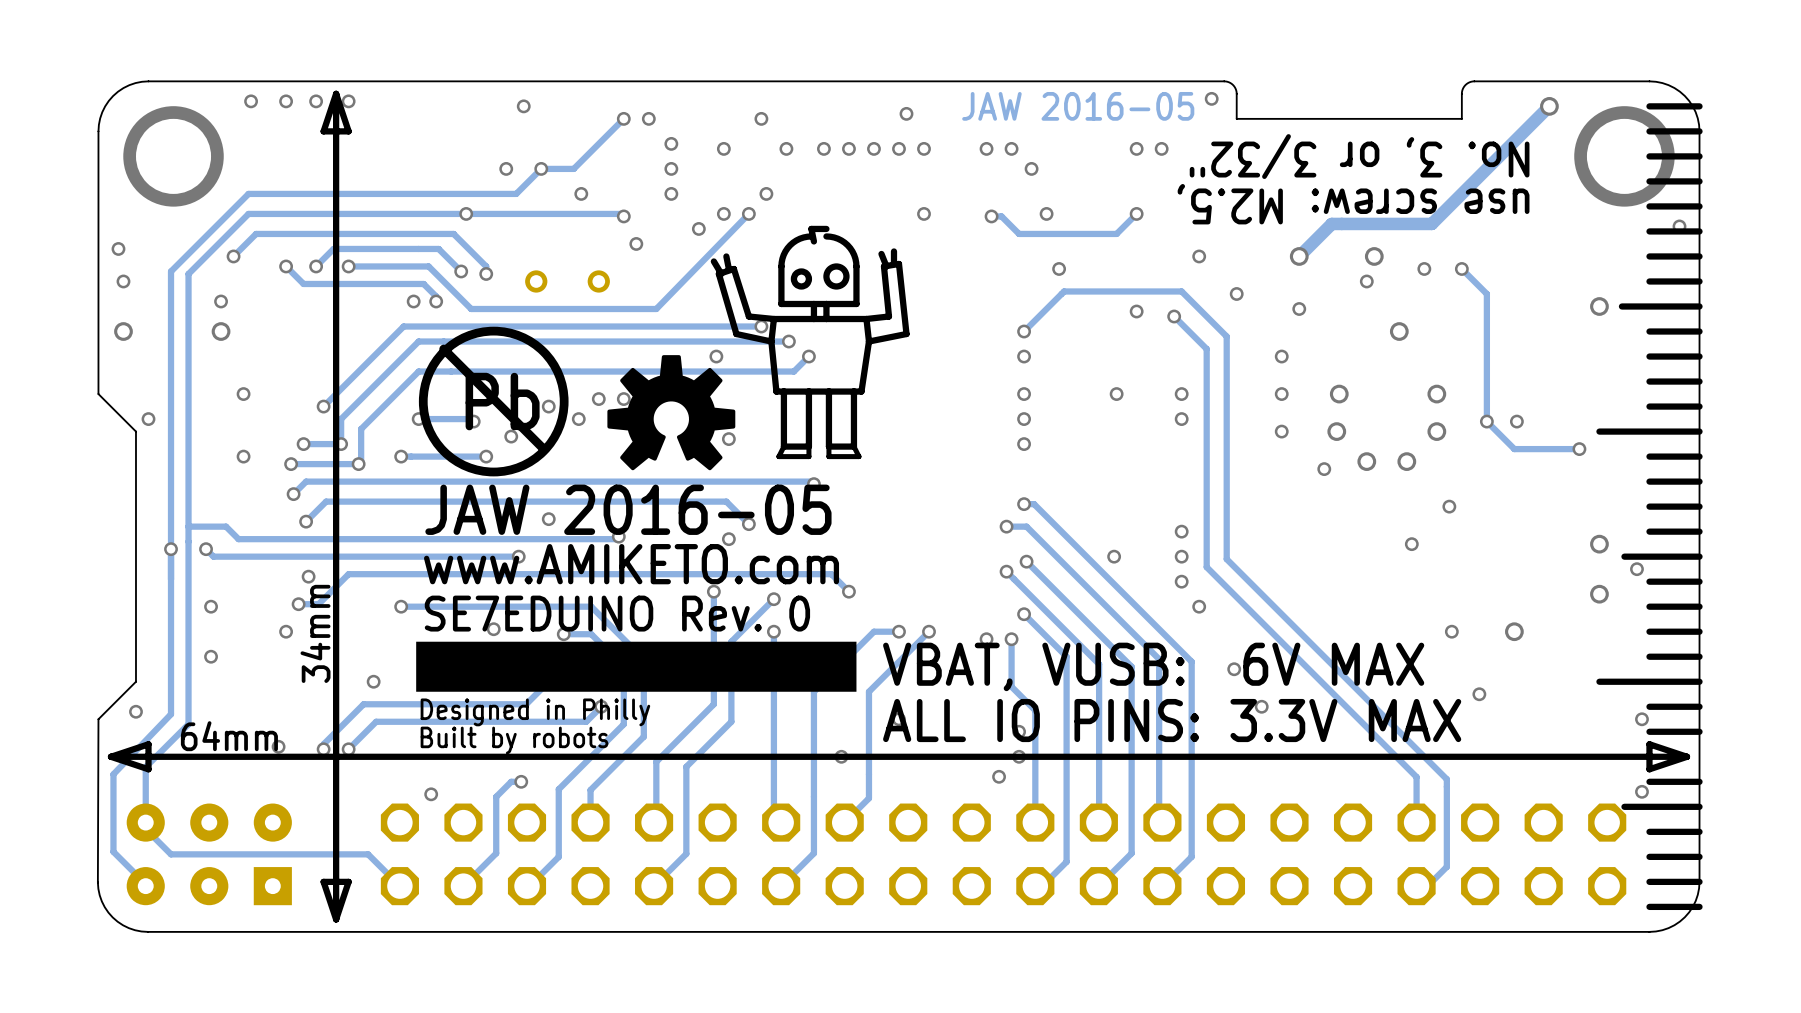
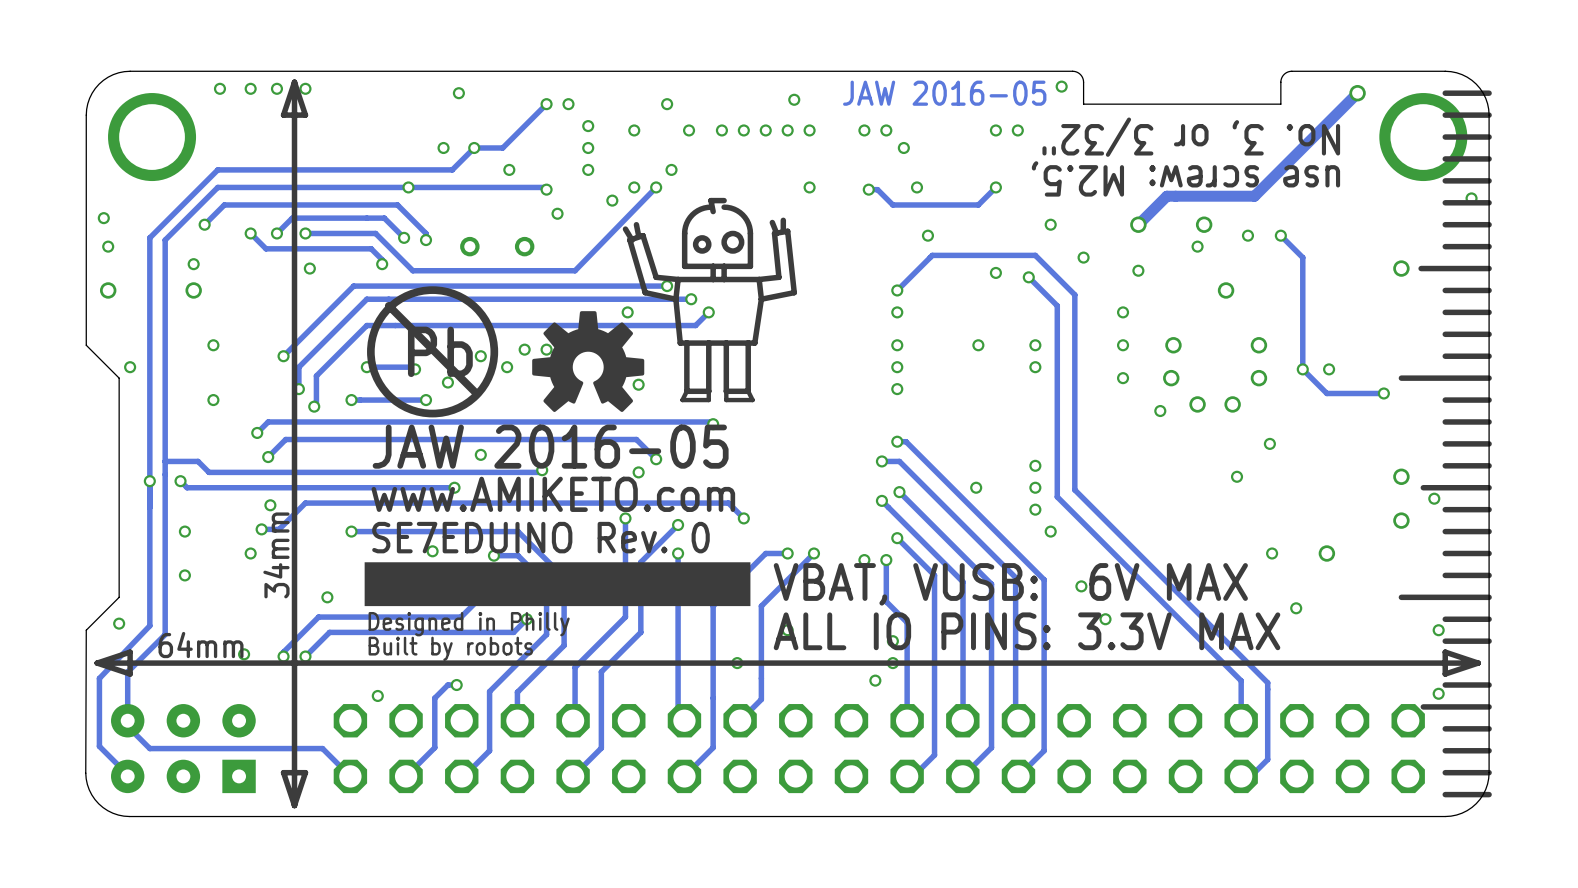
via position: (413, 301) -> (309, 268)
via: (303, 444) -> none
track: (341, 444) (303, 444) -> none
via: (291, 464) -> none
track: (358, 464) (291, 464) -> none

